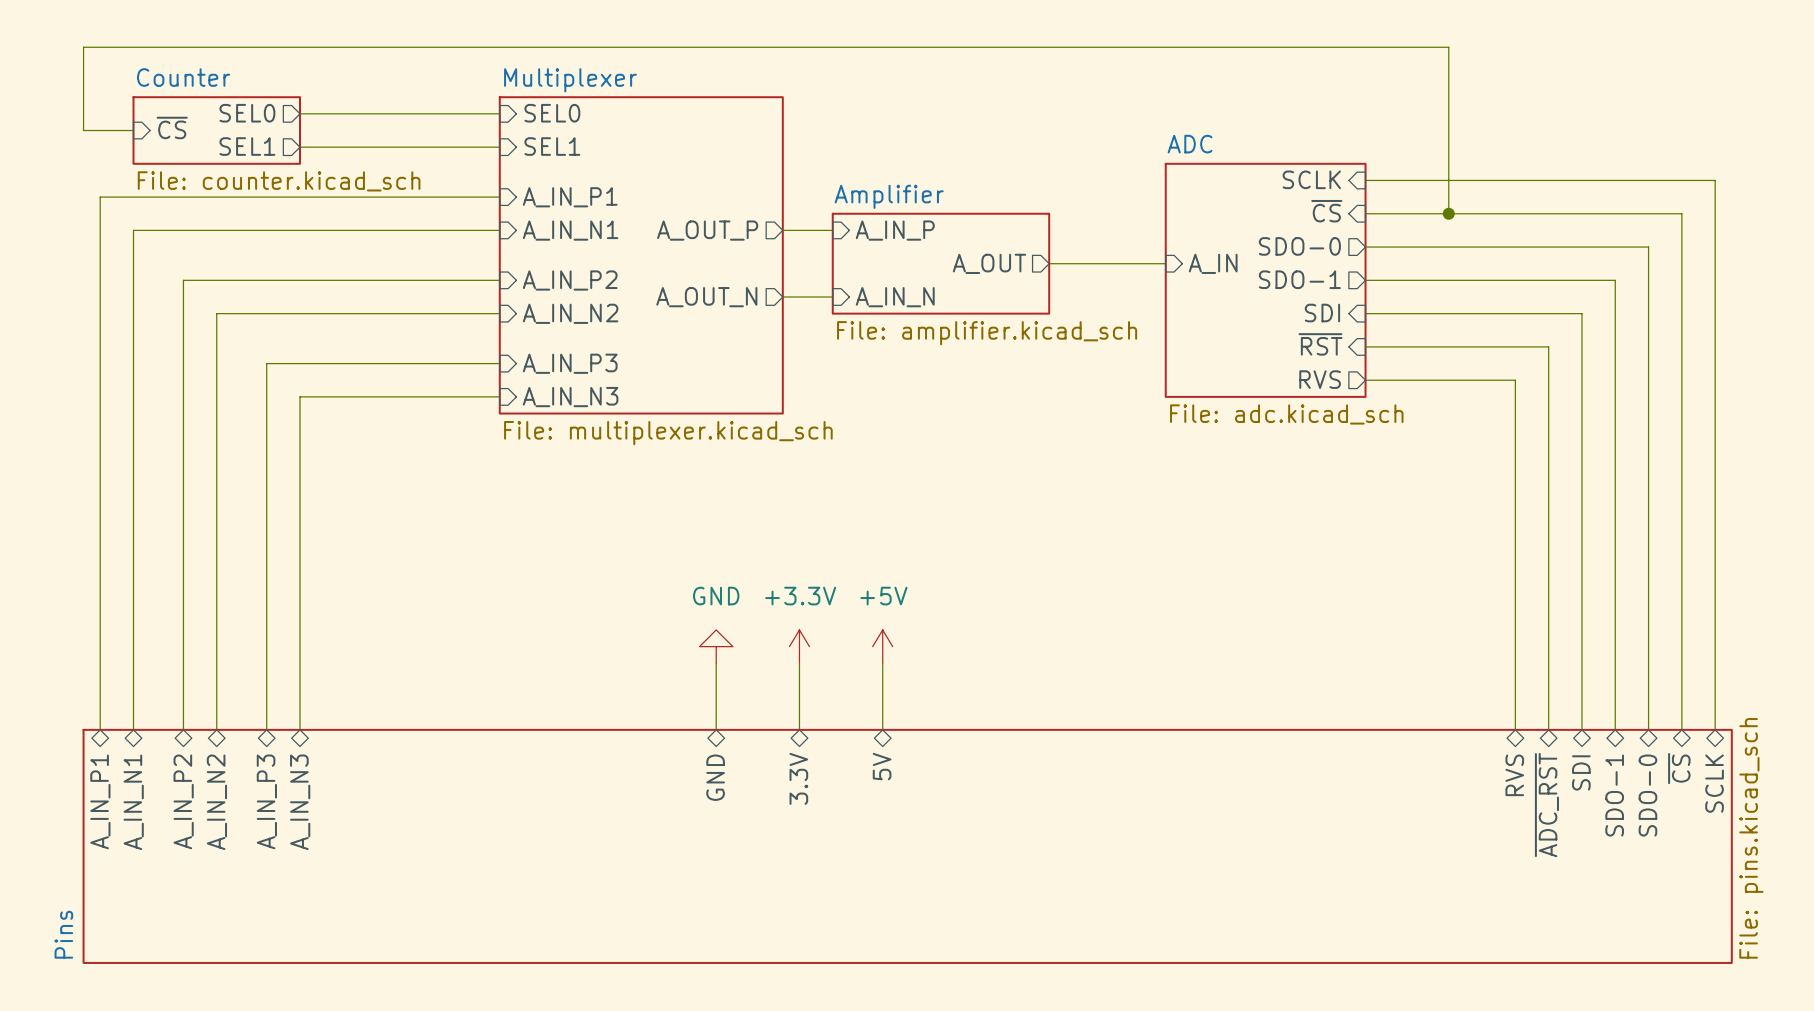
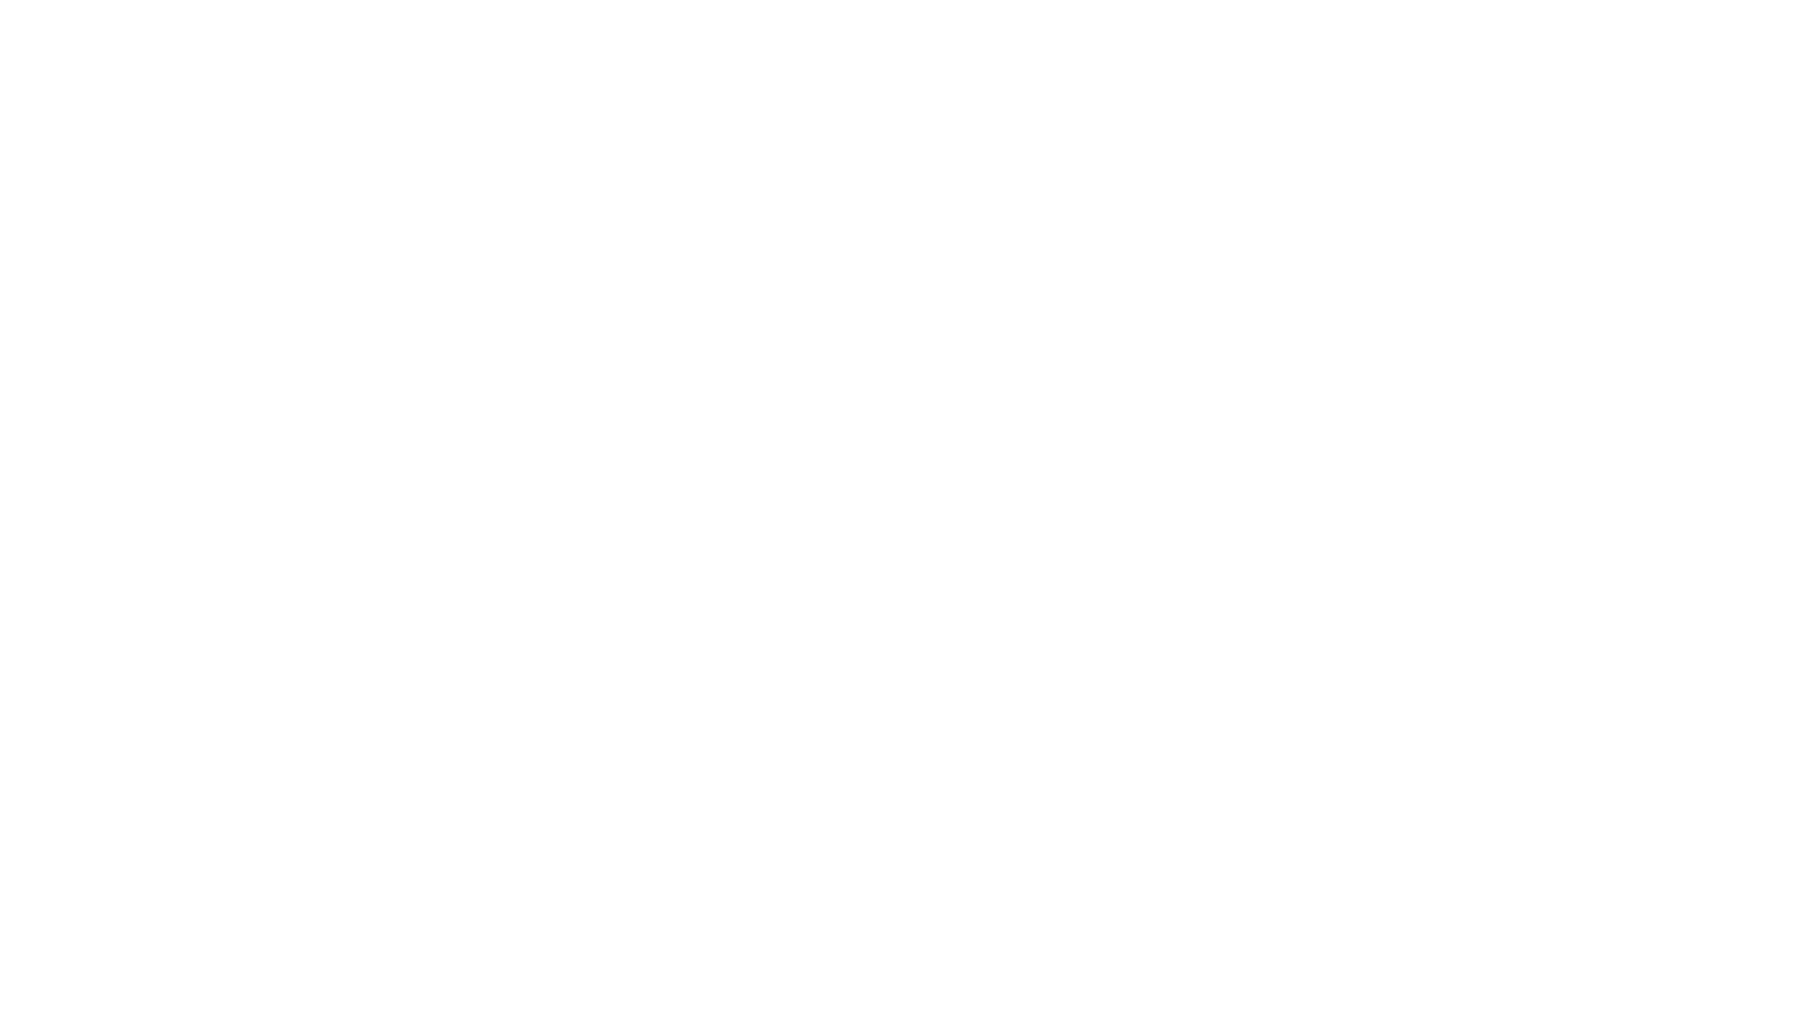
sheet pin: SEL0 (247, 113) -> none
wire: (299, 113) (499, 113) -> none
sheet pin: SEL0 (552, 113) -> none
sheet pin: ~{CS} (172, 127) -> none
wire: (133, 130) (83, 130) (83, 47) (1448, 47) (1448, 213) -> none
sheet Counter: File: counter.kicad_sch (216, 130) -> none
sheet pin: SEL1 (247, 146) -> none
sheet pin: SEL1 (552, 146) -> none
wire: (299, 147) (499, 147) -> none
sheet pin: SCLK (1311, 179) -> none
wire: (1365, 180) (1715, 180) (1715, 729) -> none
wire: (499, 197) (100, 197) (100, 729) -> none
sheet pin: A_IN_P1 (570, 197) -> none
sheet pin: ~{CS} (1326, 211) -> none
wire: (1365, 213) (1681, 213) (1681, 729) -> none
junction: (1448, 213) -> none
wire: (499, 230) (133, 230) (133, 729) -> none
sheet pin: A_IN_N1 (570, 230) -> none
sheet pin: A_OUT_P (707, 230) -> none
wire: (782, 230) (832, 230) -> none
sheet pin: A_IN_P (895, 230) -> none
sheet pin: SDO-0 (1299, 246) -> none
wire: (1365, 247) (1648, 247) (1648, 729) -> none
sheet Multiplexer: File: multiplexer.kicad_sch (641, 255) -> none
sheet Amplifier: File: amplifier.kicad_sch (940, 263) -> none
sheet pin: A_OUT (989, 263) -> none
wire: (1049, 263) (1165, 263) -> none
sheet pin: A_IN (1213, 263) -> none
sheet pin: SDO-1 (1299, 279) -> none
wire: (499, 280) (183, 280) (183, 729) -> none
sheet pin: A_IN_P2 (570, 280) -> none
sheet ADC: File: adc.kicad_sch (1265, 280) -> none
wire: (1365, 280) (1615, 280) (1615, 729) -> none
wire: (782, 296) (832, 296) -> none
sheet pin: A_OUT_N (706, 297) -> none
sheet pin: A_IN_N (895, 297) -> none
wire: (499, 313) (216, 313) (216, 729) -> none
sheet pin: A_IN_N2 (570, 313) -> none
sheet pin: SDI (1322, 313) -> none
wire: (1365, 313) (1581, 313) (1581, 729) -> none
sheet pin: ~{RST} (1320, 344) -> none
wire: (1365, 346) (1548, 346) (1548, 729) -> none
wire: (499, 363) (266, 363) (266, 729) -> none
sheet pin: A_IN_P3 (570, 363) -> none
sheet pin: RVS (1320, 379) -> none
wire: (1365, 380) (1515, 380) (1515, 729) -> none
wire: (499, 396) (299, 396) (299, 729) -> none
sheet pin: A_IN_N3 (570, 397) -> none
power symbol: GND (716, 646) -> none
power symbol: +3.3V (799, 646) -> none
power symbol: +5V (882, 646) -> none
wire: (716, 663) (716, 729) -> none
wire: (799, 663) (799, 729) -> none
wire: (882, 663) (882, 729) -> none
sheet pin: 5V (882, 766) -> none
sheet pin: ~{CS} (1679, 768) -> none
sheet pin: SDI (1581, 772) -> none
sheet pin: RVS (1514, 775) -> none
sheet pin: GND (715, 777) -> none
sheet pin: 3.3V (798, 778) -> none
sheet pin: SCLK (1714, 783) -> none
sheet pin: SDO-1 (1614, 795) -> none
sheet pin: SDO-0 (1647, 795) -> none
sheet pin: A_IN_P1 (100, 801) -> none
sheet pin: A_IN_P2 (183, 801) -> none
sheet pin: A_IN_P3 (266, 801) -> none
sheet pin: A_IN_N1 (133, 802) -> none
sheet pin: A_IN_N2 (216, 802) -> none
sheet pin: A_IN_N3 (300, 802) -> none
sheet pin: ~{ADC_RST} (1546, 805) -> none
sheet Pins: File: pins.kicad_sch (907, 846) -> none

